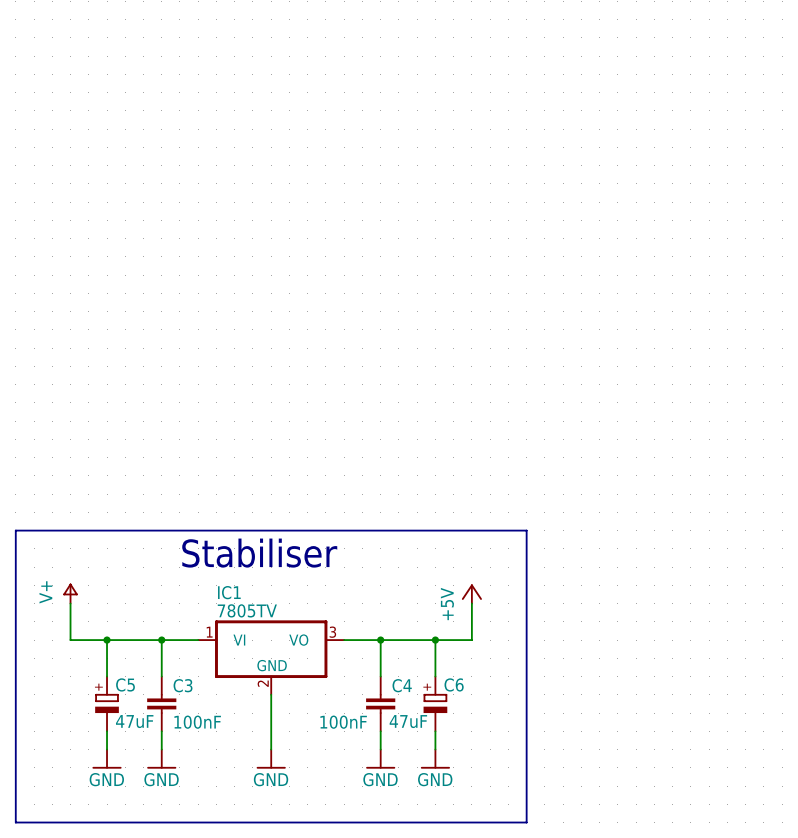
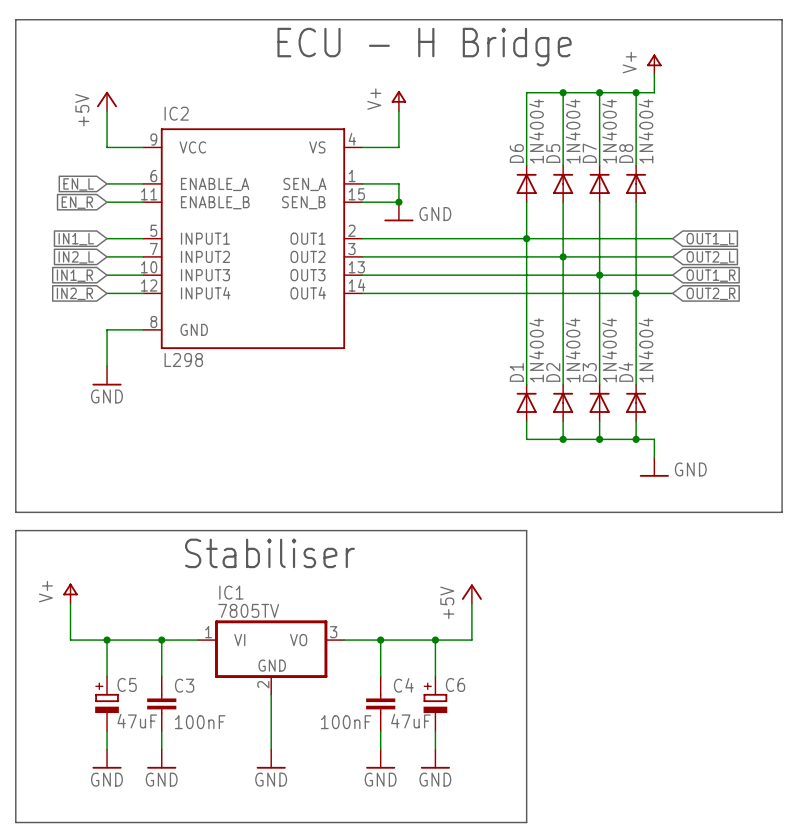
line: none -> (15, 19) (782, 19) (782, 512) (15, 512) (15, 19)
text: none -> ECU - H Bridge (424, 47)
power symbol: none -> V+ (654, 64)
wire: none -> (654, 74) (654, 92) (526, 92) (526, 165)
wire: none -> (563, 92) (563, 165)
junction: none -> (563, 92)
wire: none -> (599, 92) (599, 165)
junction: none -> (599, 92)
wire: none -> (636, 92) (636, 165)
junction: none -> (636, 92)
power symbol: none -> V+ (398, 100)
power symbol: none -> +5V (107, 101)
wire: none -> (107, 110) (107, 147) (143, 147)
wire: none -> (398, 110) (398, 147) (362, 147)
wire: none -> (107, 183) (143, 183)
wire: none -> (362, 183) (398, 183) (398, 202) (362, 202)
D6: none -> 1N4004 (526, 183)
D5: none -> 1N4004 (563, 183)
D7: none -> 1N4004 (599, 183)
D8: none -> 1N4004 (636, 183)
global label: none -> EN_L (78, 184)
wire: none -> (107, 202) (143, 202)
junction: none -> (398, 202)
wire: none -> (526, 202) (526, 384)
wire: none -> (563, 202) (563, 384)
wire: none -> (599, 202) (599, 384)
wire: none -> (636, 202) (636, 384)
global label: none -> EN_R (77, 202)
power symbol: none -> GND (398, 211)
wire: none -> (107, 238) (143, 238)
IC2: none -> L298 (252, 238)
wire: none -> (362, 238) (672, 238)
junction: none -> (526, 238)
global label: none -> IN1_L (76, 239)
global label: none -> OUT1_L (710, 239)
wire: none -> (107, 256) (143, 256)
wire: none -> (362, 256) (672, 256)
junction: none -> (563, 256)
global label: none -> IN2_L (76, 257)
global label: none -> OUT2_L (710, 257)
wire: none -> (107, 275) (143, 275)
wire: none -> (362, 275) (672, 275)
junction: none -> (599, 275)
global label: none -> IN1_R (74, 275)
global label: none -> OUT1_R (711, 275)
wire: none -> (107, 293) (143, 293)
wire: none -> (362, 293) (672, 293)
junction: none -> (636, 293)
global label: none -> IN2_R (74, 293)
global label: none -> OUT2_R (711, 293)
wire: none -> (143, 329) (107, 329) (107, 366)
power symbol: none -> GND (107, 375)
D1: none -> 1N4004 (526, 402)
D2: none -> 1N4004 (563, 402)
D3: none -> 1N4004 (599, 402)
D4: none -> 1N4004 (636, 402)
wire: none -> (526, 421) (526, 439) (654, 439) (654, 457)
wire: none -> (563, 421) (563, 439)
wire: none -> (599, 421) (599, 439)
wire: none -> (636, 421) (636, 439)
junction: none -> (563, 439)
junction: none -> (599, 439)
junction: none -> (636, 439)
power symbol: none -> GND (654, 467)

